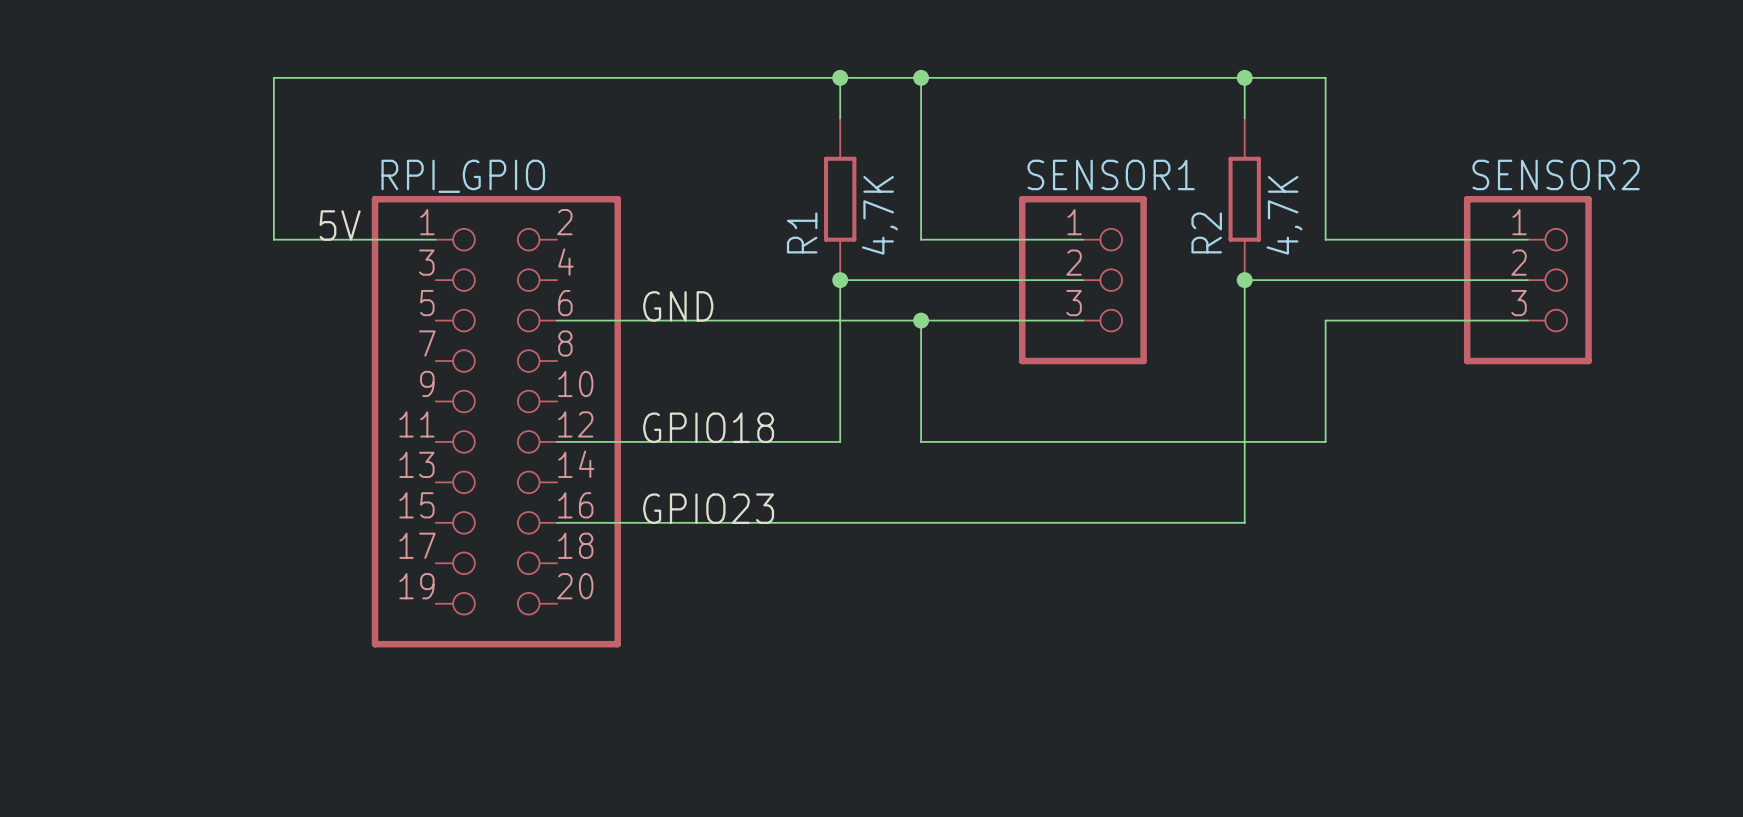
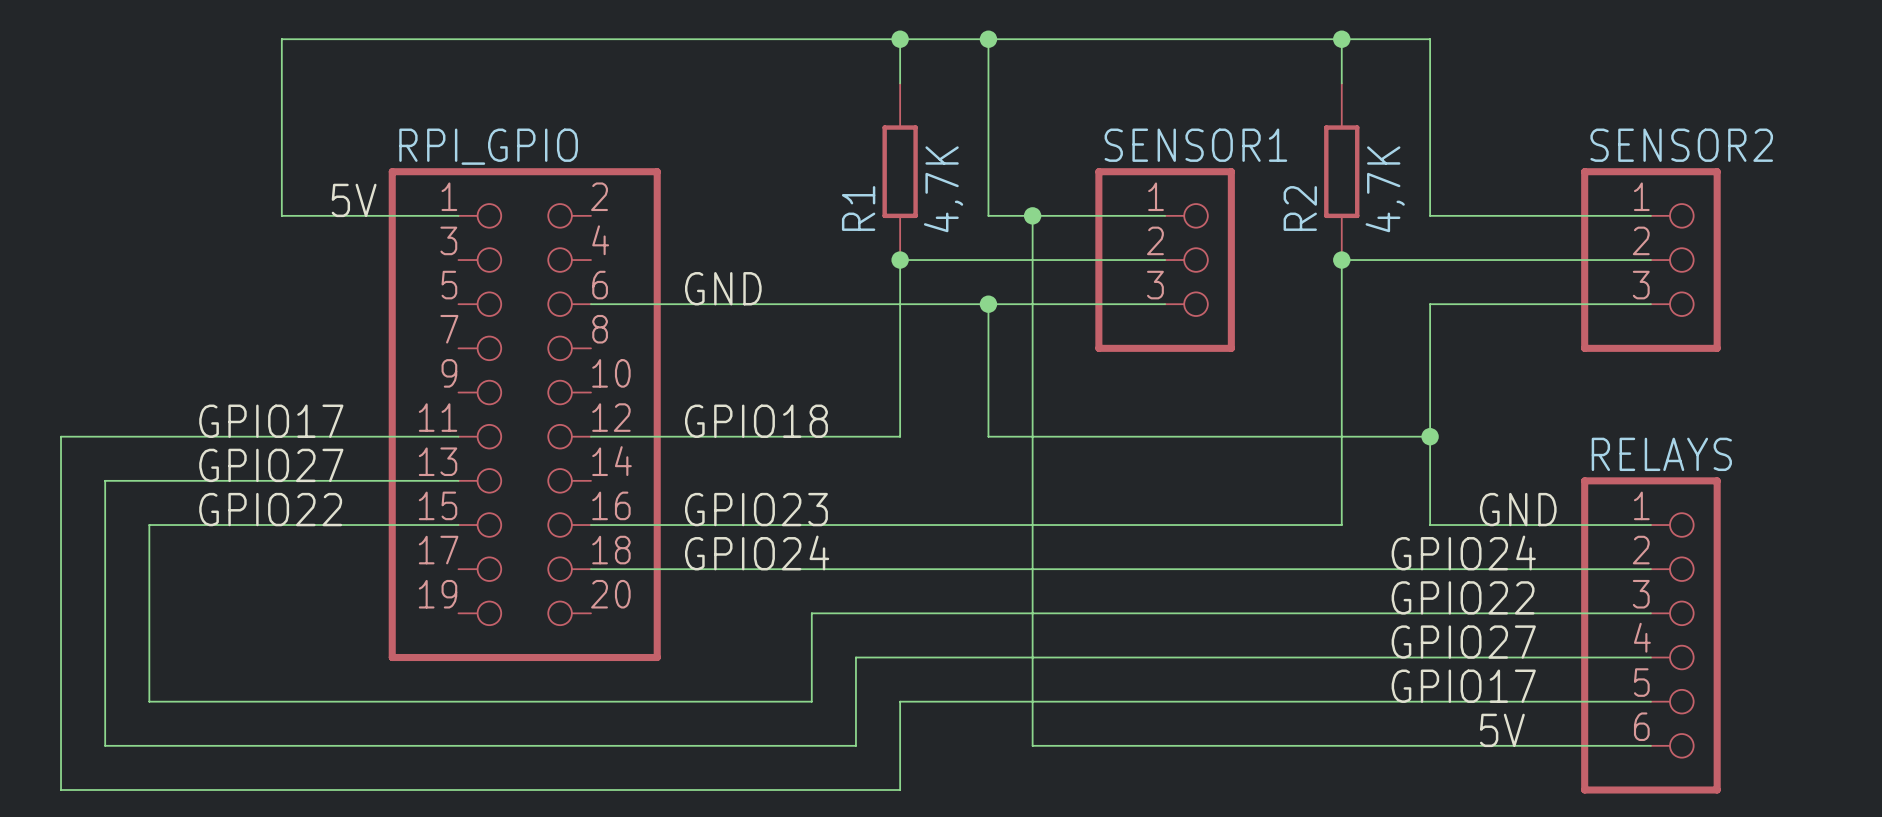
wire: none -> (1032, 215) (1032, 745) (1650, 745)
junction: none -> (1032, 215)
label: none -> GPIO17 (271, 421)
wire: none -> (458, 436) (61, 436) (61, 790) (900, 790) (900, 701) (1650, 701)
wire: none -> (1430, 436) (1430, 525) (1650, 525)
junction: none -> (1430, 436)
label: none -> GPIO27 (271, 465)
wire: none -> (458, 480) (105, 480) (105, 745) (855, 745) (855, 657) (1650, 657)
label: none -> GPIO22 (270, 509)
label: none -> GND (1518, 509)
wire: none -> (458, 525) (149, 525) (149, 701) (811, 701) (811, 613) (1650, 613)
label: none -> GPIO24 (757, 552)
label: none -> GPIO24 (1463, 552)
wire: none -> (590, 569) (1650, 569)
label: none -> GPIO22 (1463, 597)
RELAYS: none -> (1650, 635)
label: none -> GPIO27 (1463, 642)
label: none -> GPIO17 (1463, 686)
label: none -> 5V (1502, 730)

